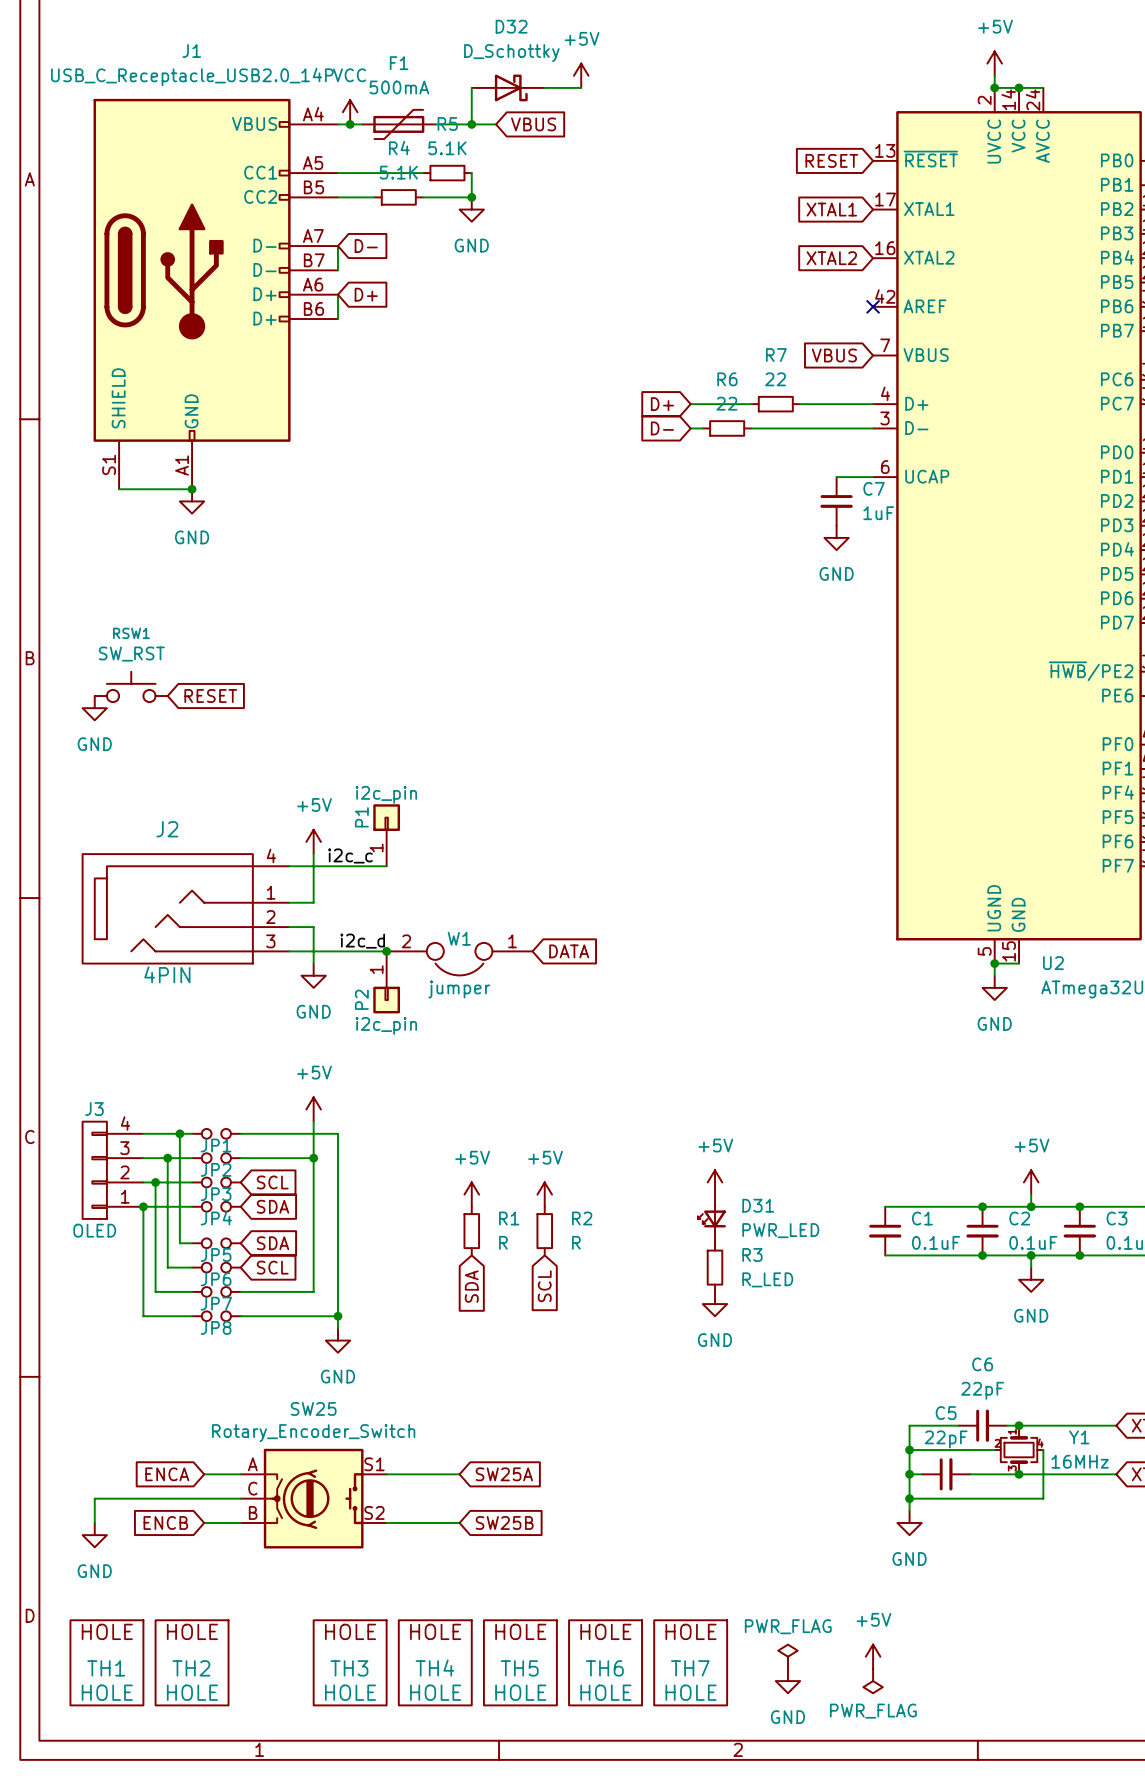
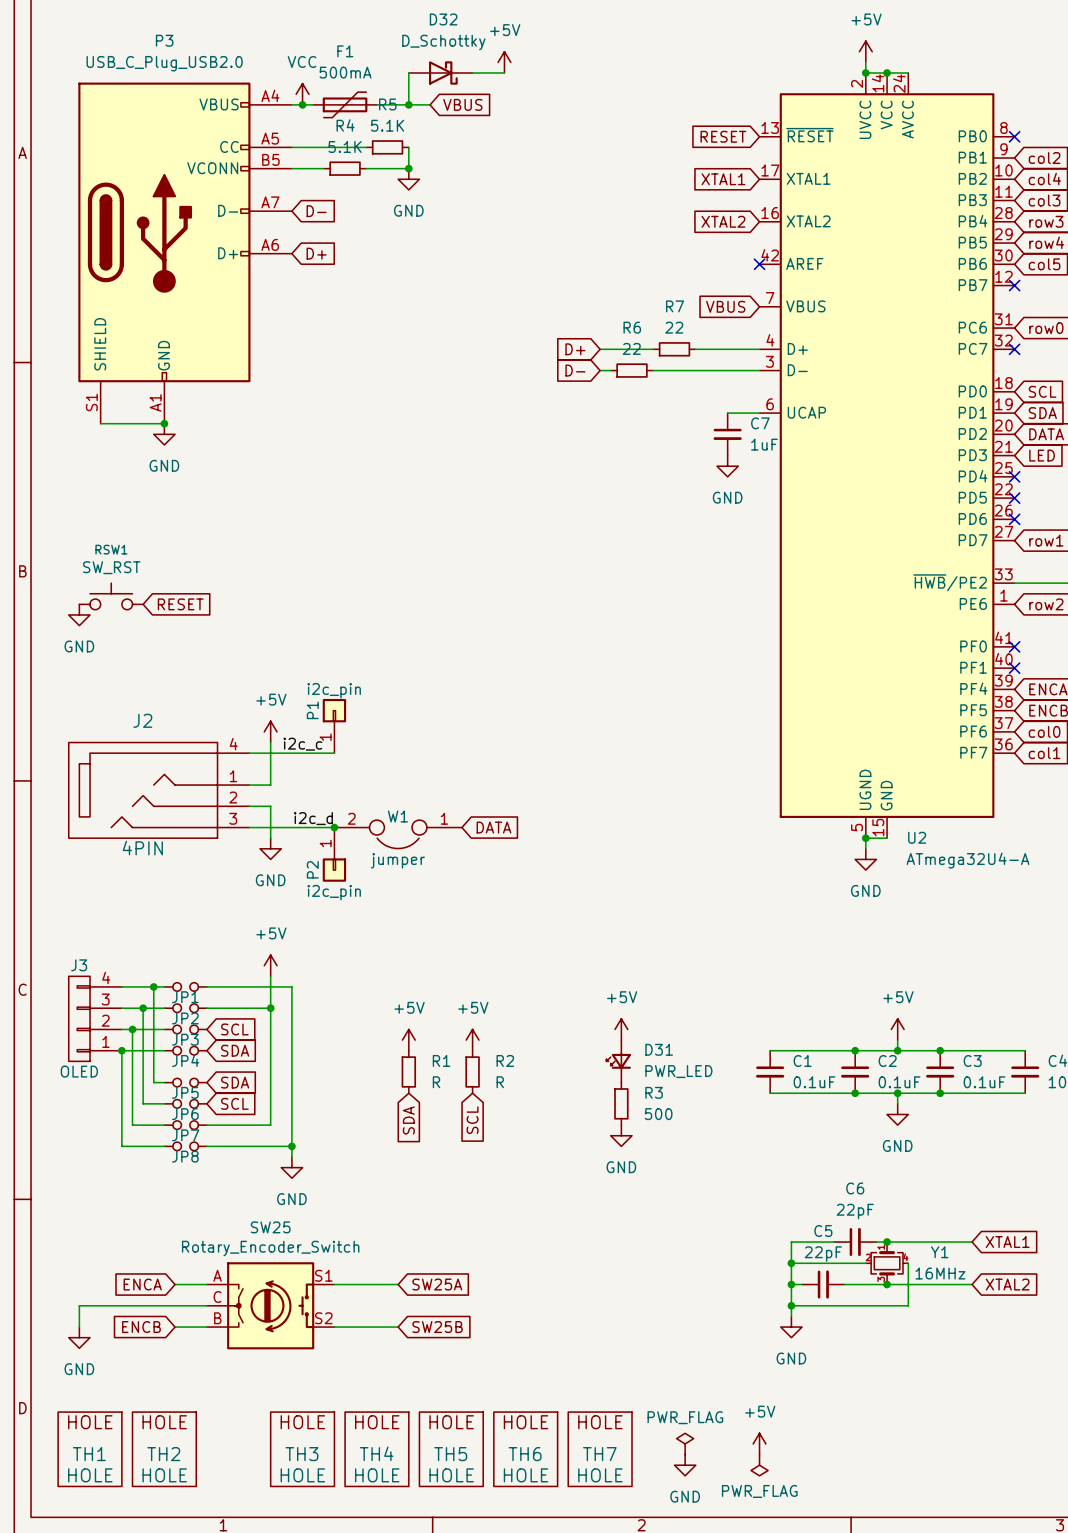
wire: (337, 246) (337, 270) -> none
J1: USB_C_Receptacle_USB2.0_14P (215, 294) -> none
P3: none -> USB_C_Plug_USB2.0 (185, 253)
wire: (337, 294) (337, 319) -> none
R3 value: R_LED (767, 1279) -> 500 (658, 1114)
SW25 symbol: [240, 1448, 387, 1549] -> [206, 1262, 335, 1350]

